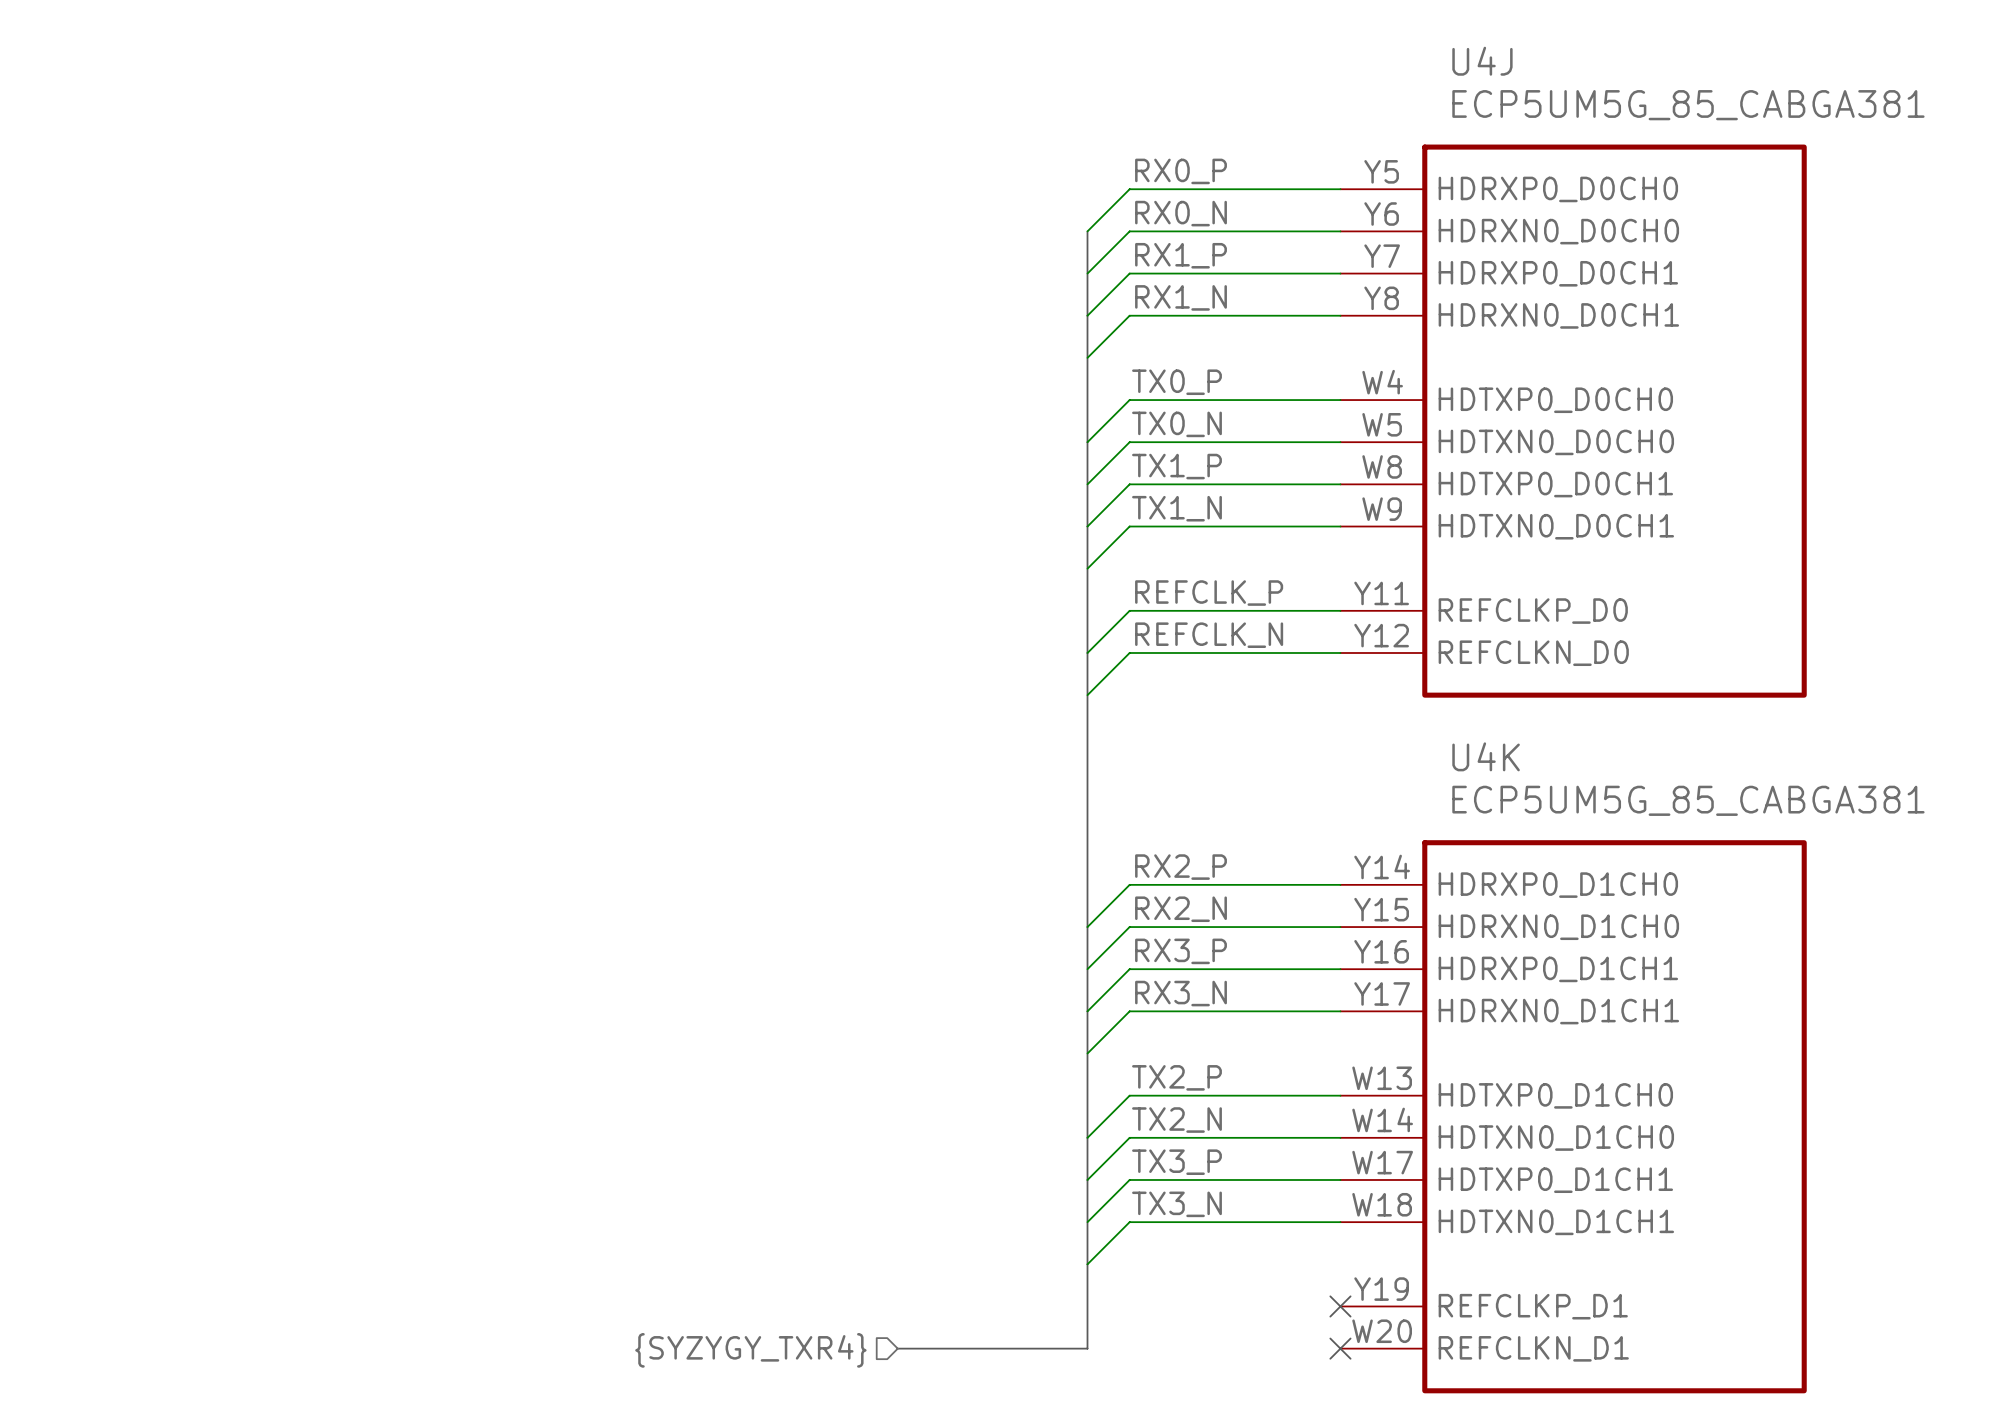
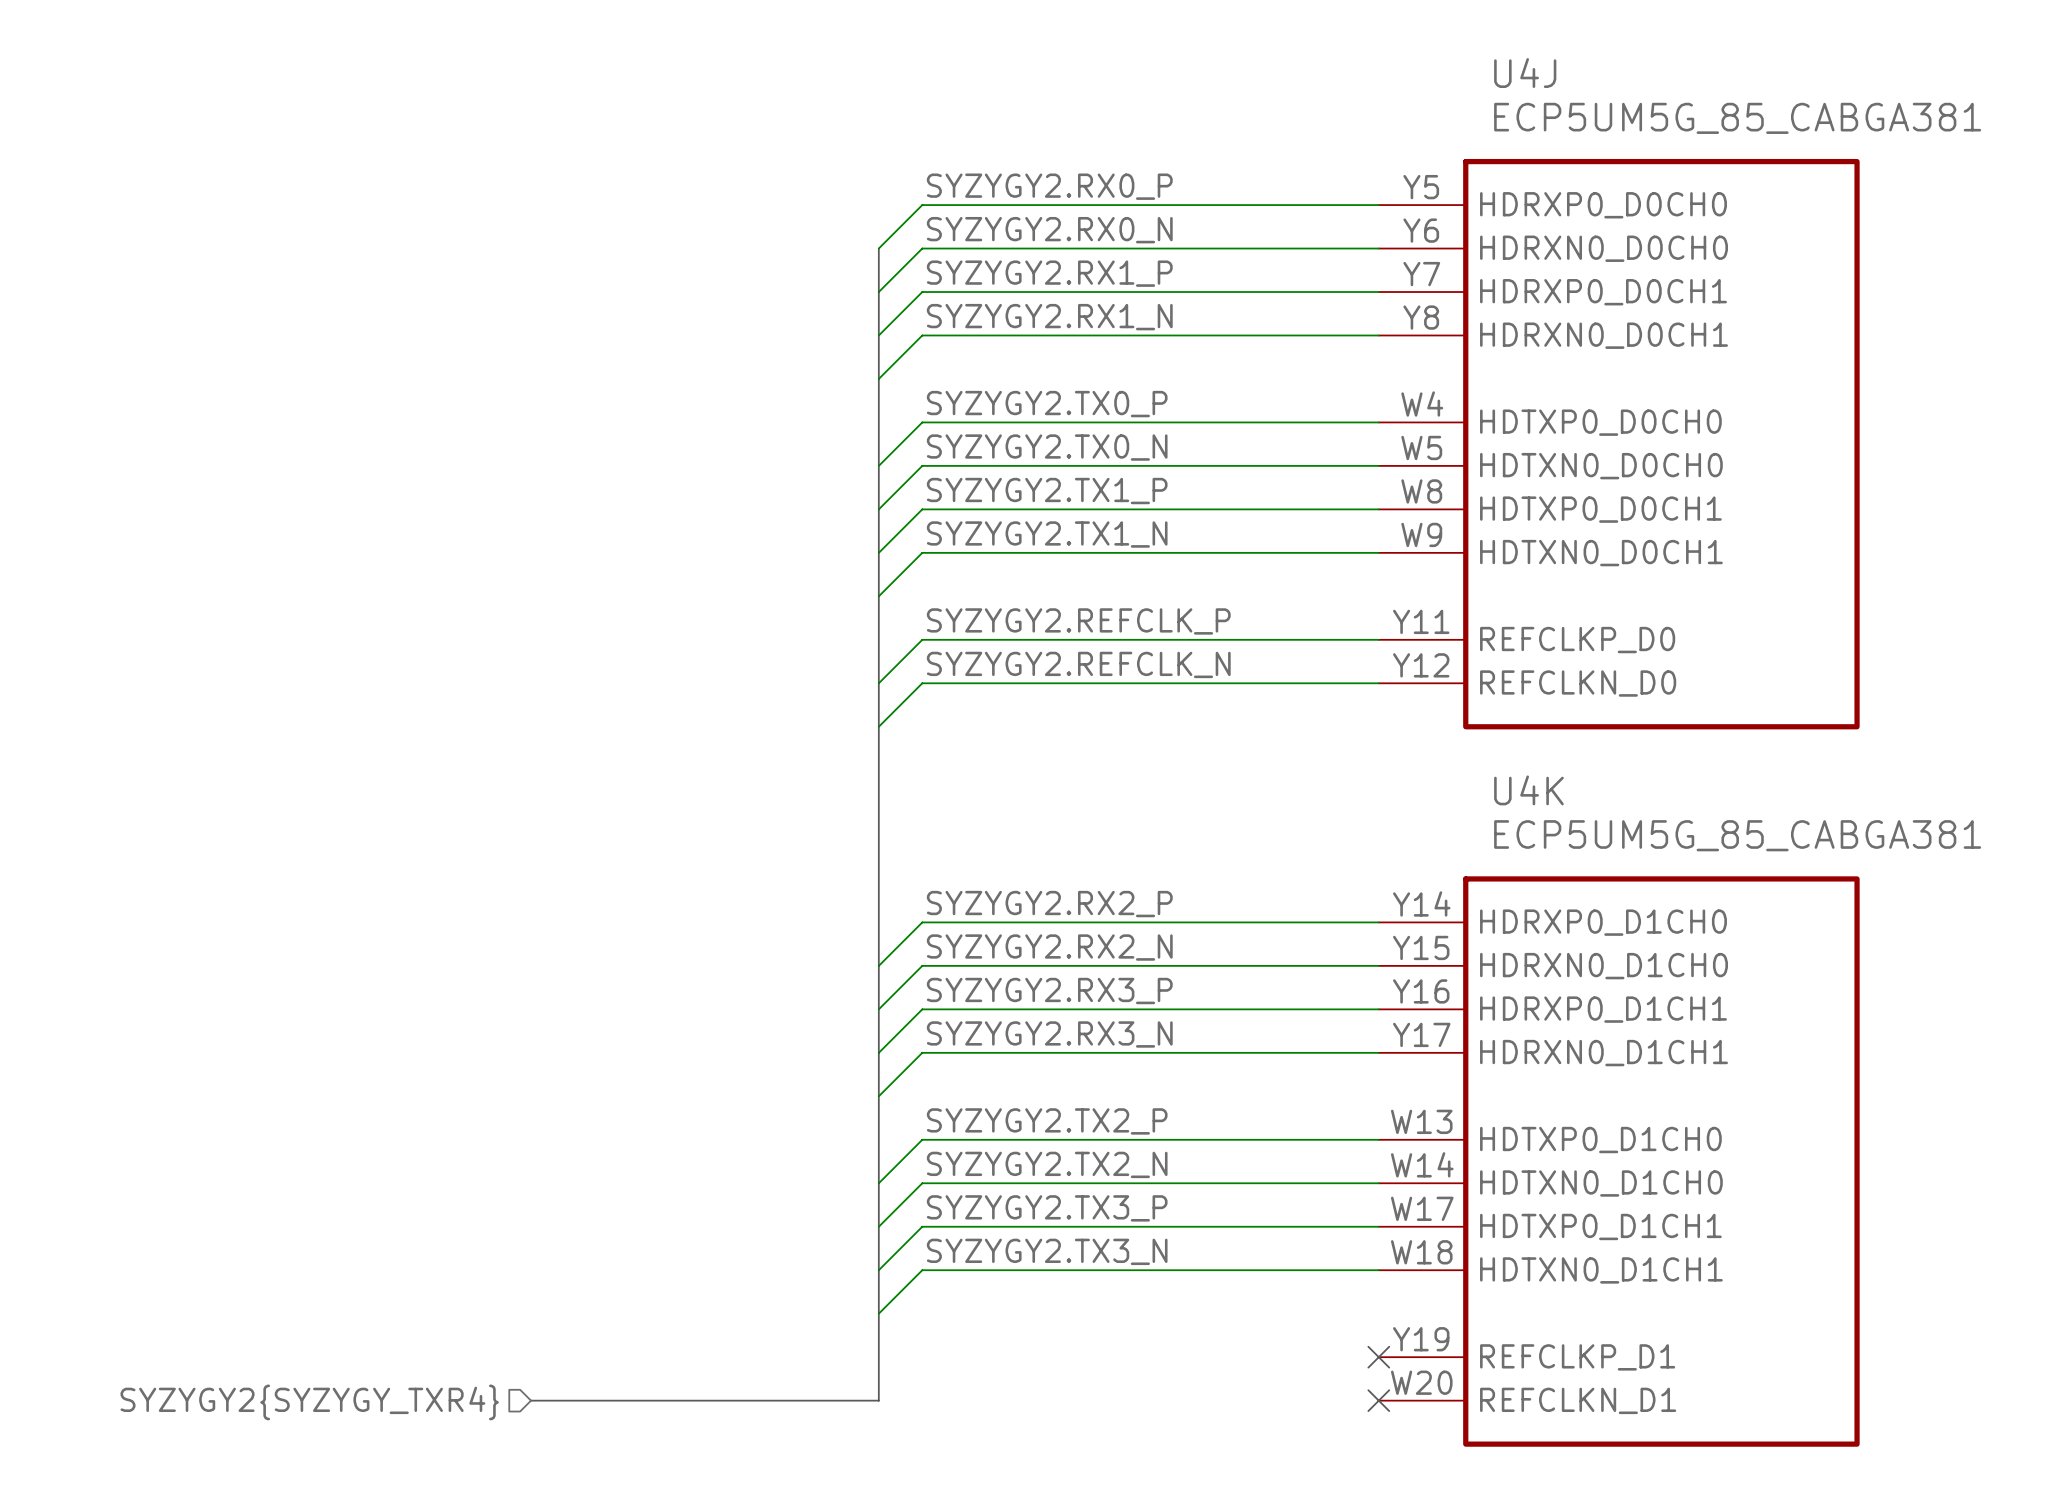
label: none -> SYZYGY2.RX0_P (1049, 186)
label: RX0_P (1181, 171) -> none
wire: (1129, 189) (1087, 231) -> (1161, 205) (922, 205) (878, 248)
label: none -> SYZYGY2.RX0_N (1049, 230)
label: RX0_N (1181, 213) -> none
bus: none -> (878, 248) (878, 1400) (531, 1400)
bus: (1087, 231) (1087, 1348) (897, 1348) -> none
wire: (1129, 231) (1087, 273) -> (1161, 248) (922, 248) (878, 292)
label: none -> SYZYGY2.RX1_P (1049, 273)
label: RX1_P (1181, 255) -> none
wire: (1129, 273) (1087, 315) -> (1161, 292) (922, 292) (878, 335)
label: none -> SYZYGY2.RX1_N (1049, 317)
label: RX1_N (1181, 297) -> none
wire: (1129, 315) (1087, 357) -> (1161, 335) (922, 335) (878, 378)
label: none -> SYZYGY2.TX0_P (1047, 404)
label: TX0_P (1177, 382) -> none
wire: (1129, 400) (1087, 442) -> (1161, 422) (922, 422) (878, 465)
label: none -> SYZYGY2.TX0_N (1047, 447)
label: TX0_N (1177, 424) -> none
wire: (1129, 442) (1087, 484) -> (1161, 465) (922, 465) (878, 509)
label: none -> SYZYGY2.TX1_P (1047, 491)
label: TX1_P (1177, 466) -> none
wire: (1129, 484) (1087, 526) -> (1161, 509) (922, 509) (878, 552)
label: none -> SYZYGY2.TX1_N (1047, 534)
label: TX1_N (1177, 508) -> none
wire: (1129, 526) (1087, 568) -> (1161, 552) (922, 552) (878, 596)
label: REFCLK_P (1209, 593) -> SYZYGY2.REFCLK_P (1078, 621)
wire: (1129, 610) (1087, 652) -> (1161, 639) (922, 639) (878, 683)
label: REFCLK_N (1209, 635) -> SYZYGY2.REFCLK_N (1078, 664)
wire: (1129, 652) (1087, 695) -> (1161, 683) (922, 683) (878, 726)
label: none -> SYZYGY2.RX2_P (1049, 904)
label: RX2_P (1181, 867) -> none
wire: (1129, 884) (1087, 927) -> (1161, 922) (922, 922) (878, 965)
label: none -> SYZYGY2.RX2_N (1049, 947)
label: RX2_N (1181, 909) -> none
wire: (1129, 927) (1087, 969) -> (1161, 965) (922, 965) (878, 1009)
label: none -> SYZYGY2.RX3_P (1049, 991)
label: RX3_P (1181, 951) -> none
wire: (1129, 969) (1087, 1011) -> (1161, 1009) (922, 1009) (878, 1052)
label: none -> SYZYGY2.RX3_N (1049, 1034)
label: RX3_N (1181, 993) -> none
wire: (1129, 1011) (1087, 1053) -> (1161, 1052) (922, 1052) (878, 1096)
label: none -> SYZYGY2.TX2_P (1047, 1121)
label: TX2_P (1177, 1077) -> none
wire: (1129, 1095) (1087, 1137) -> (1161, 1139) (922, 1139) (878, 1183)
label: none -> SYZYGY2.TX2_N (1047, 1164)
label: TX2_N (1177, 1120) -> none
wire: (1129, 1137) (1087, 1179) -> (1161, 1183) (922, 1183) (878, 1226)
label: none -> SYZYGY2.TX3_P (1047, 1208)
label: TX3_P (1177, 1162) -> none
wire: (1129, 1179) (1087, 1222) -> (1161, 1226) (922, 1226) (878, 1270)
label: none -> SYZYGY2.TX3_N (1047, 1251)
label: TX3_N (1177, 1204) -> none
wire: (1129, 1222) (1087, 1264) -> (1161, 1270) (922, 1270) (878, 1313)
hierarchical label: none -> SYZYGY2{SYZYGY_TXR4} (309, 1402)
hierarchical label: {SYZYGY_TXR4} (750, 1350) -> none

